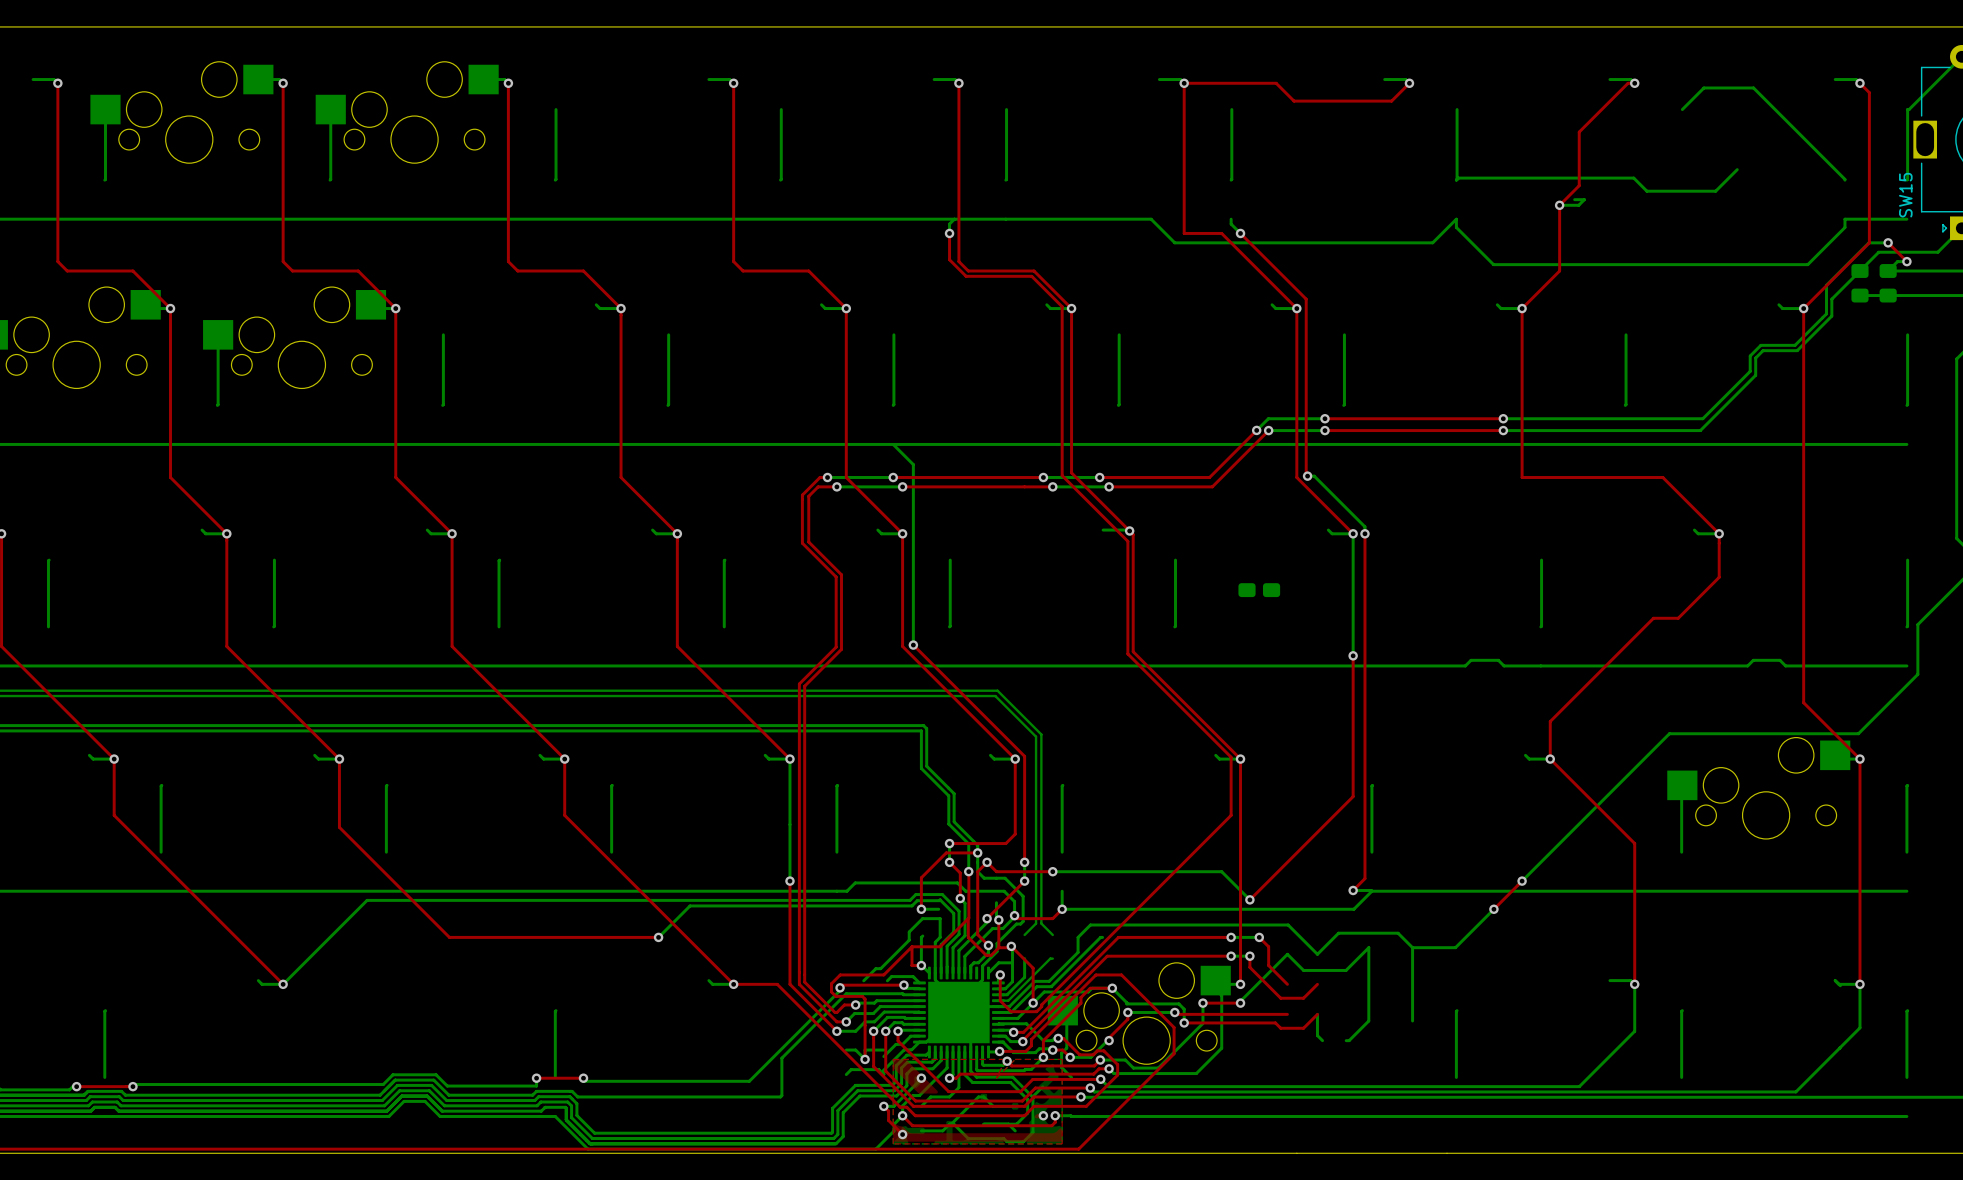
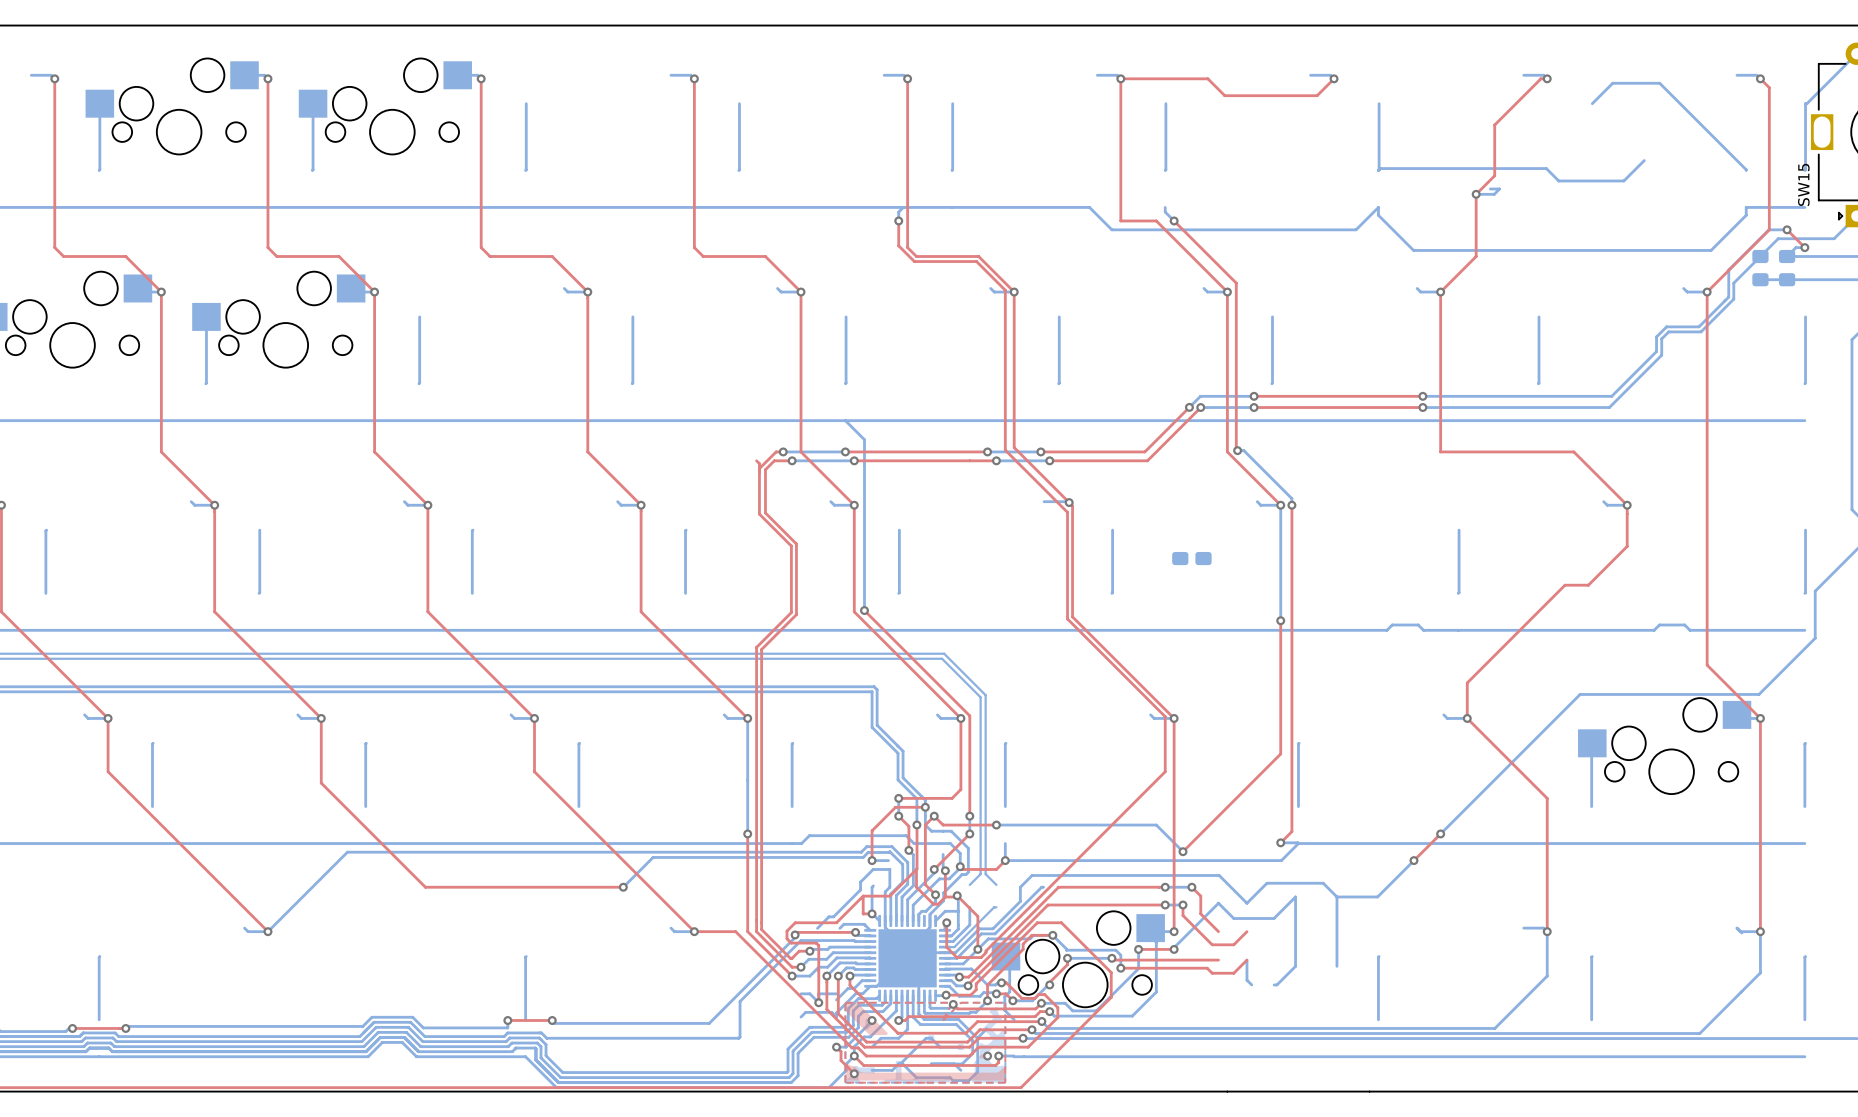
top track: none -> (756, 460) (759, 463) (759, 468)

